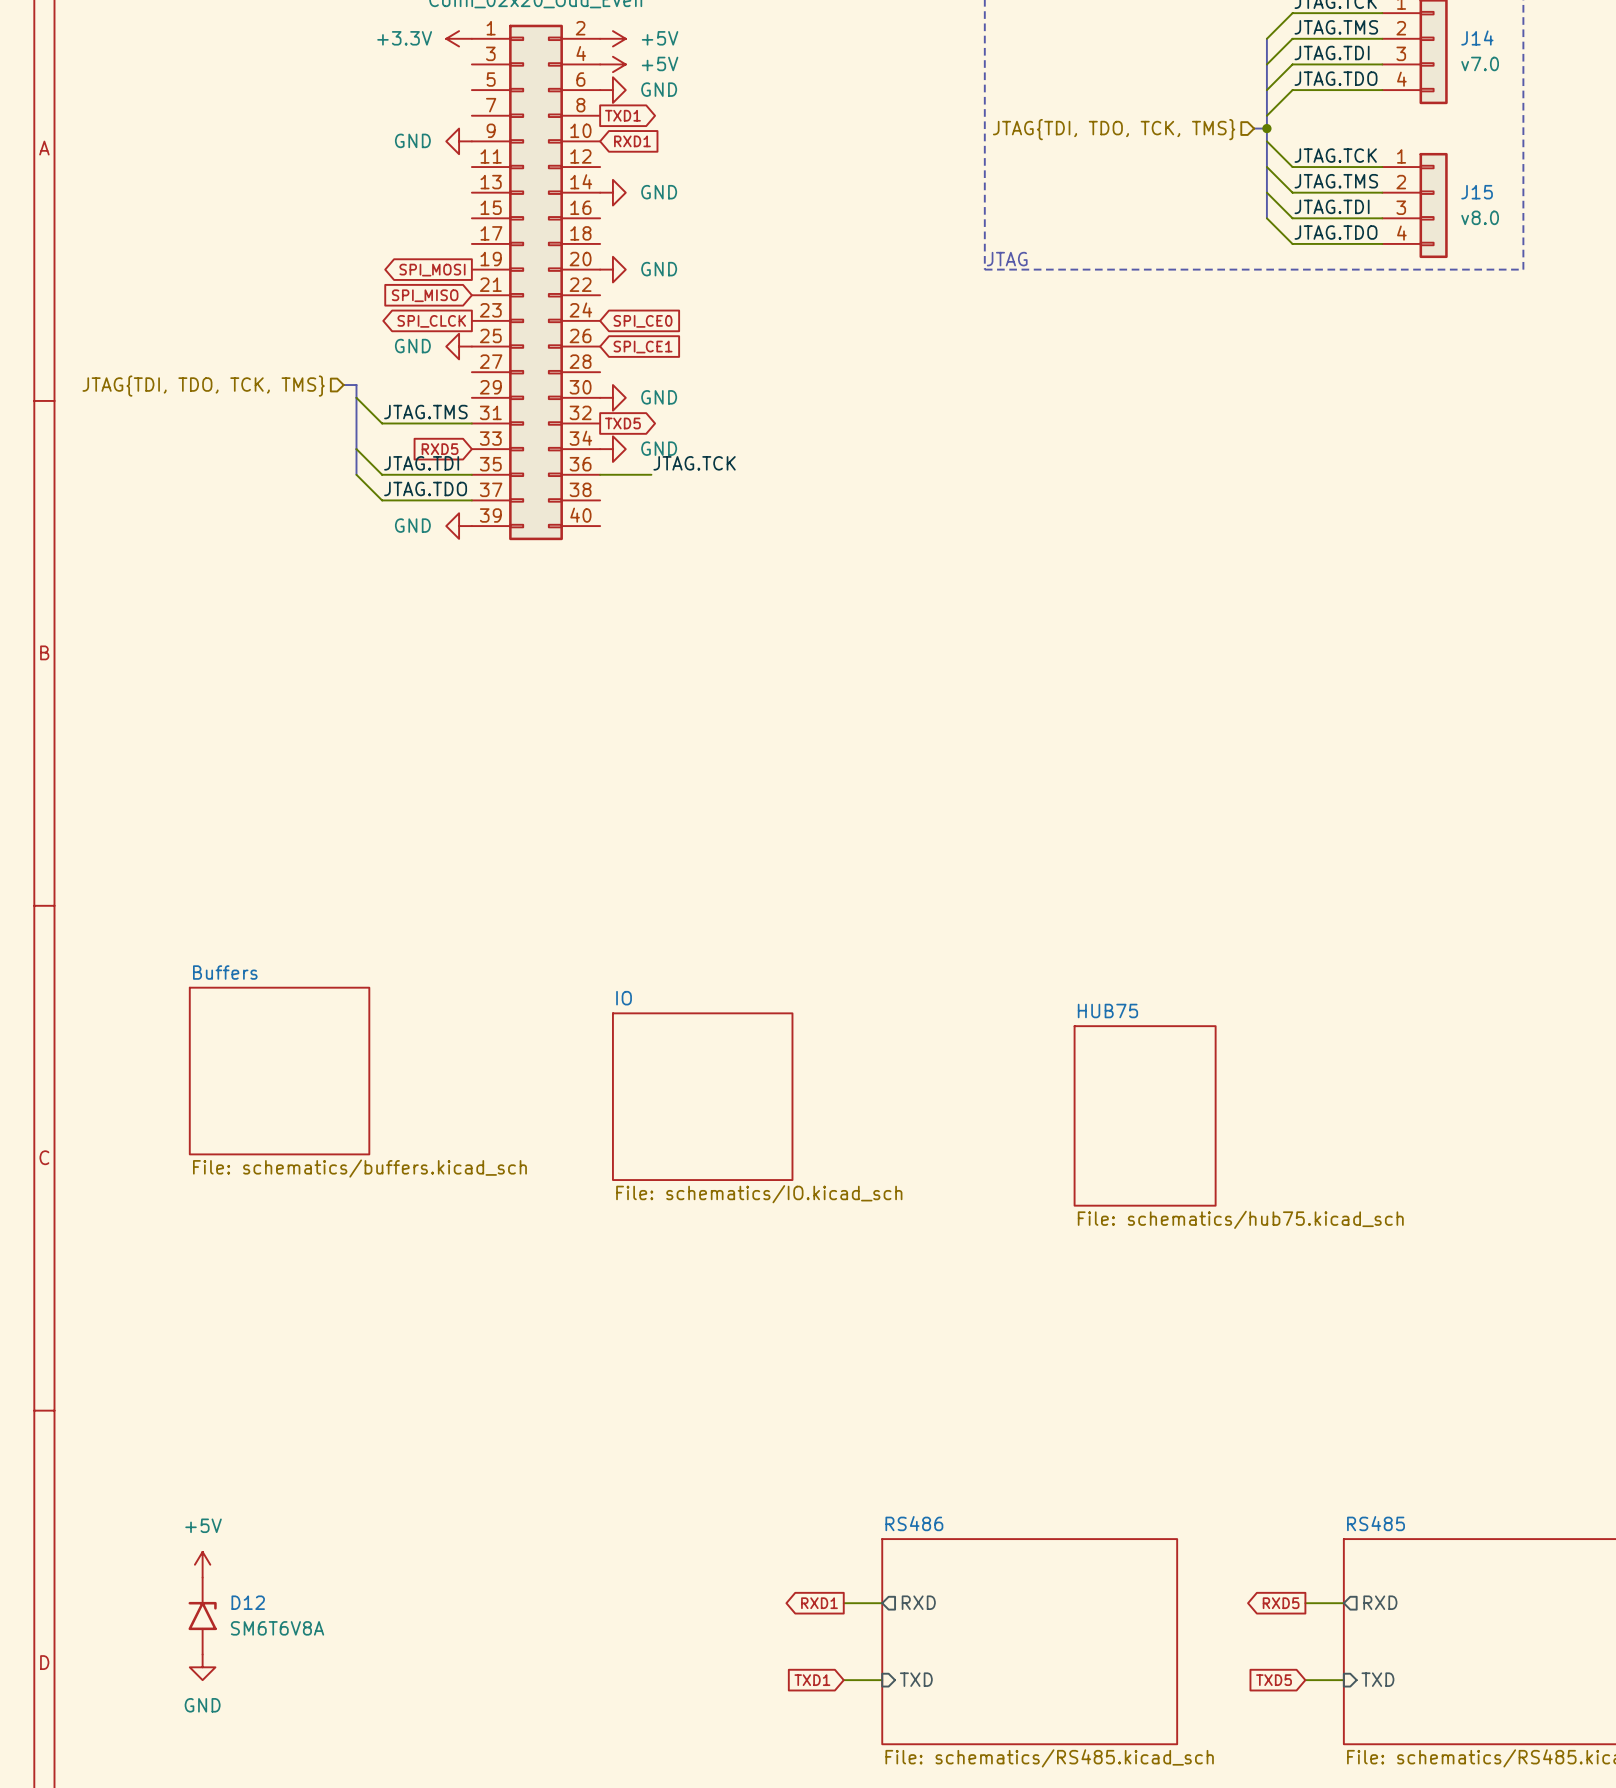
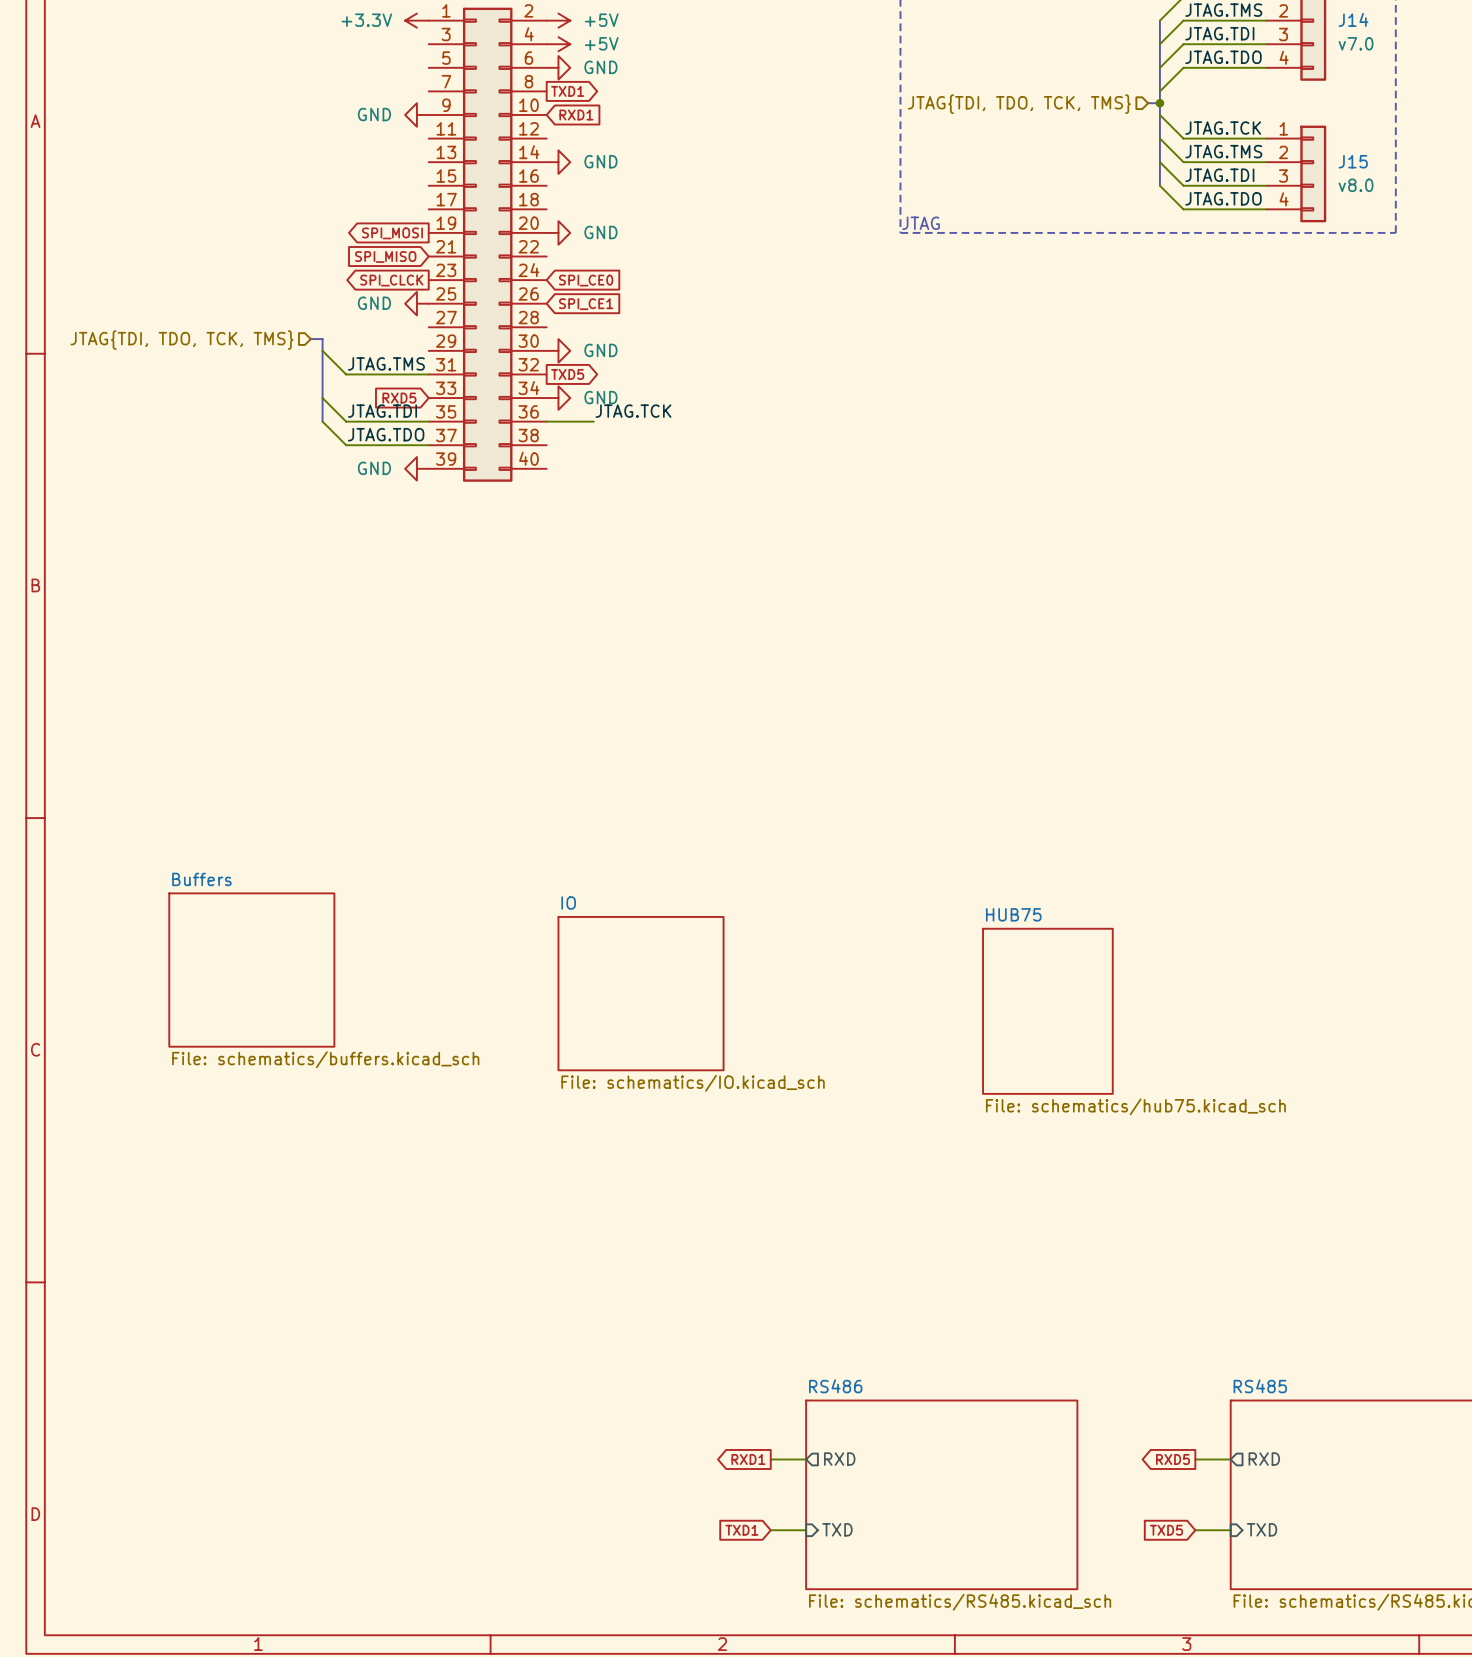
power symbol: +5V (202, 1564) -> none
D12: SM6T6V8A (202, 1616) -> none
power symbol: GND (202, 1667) -> none

